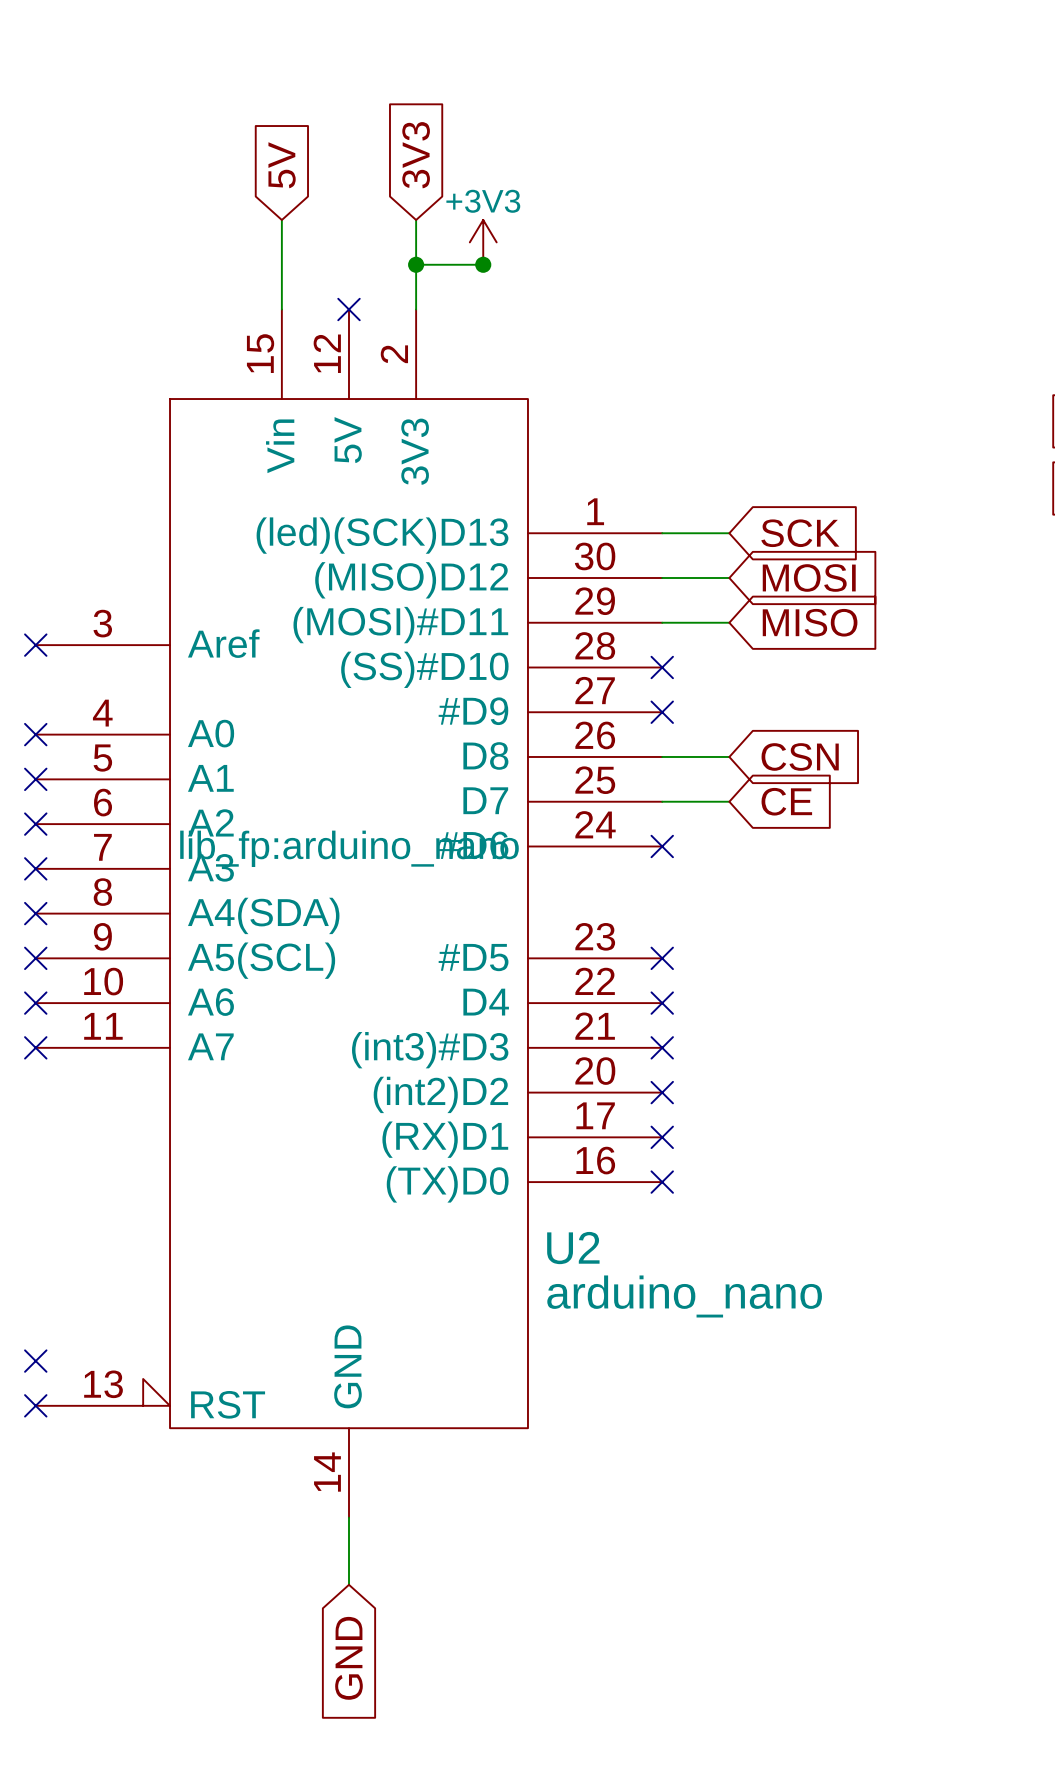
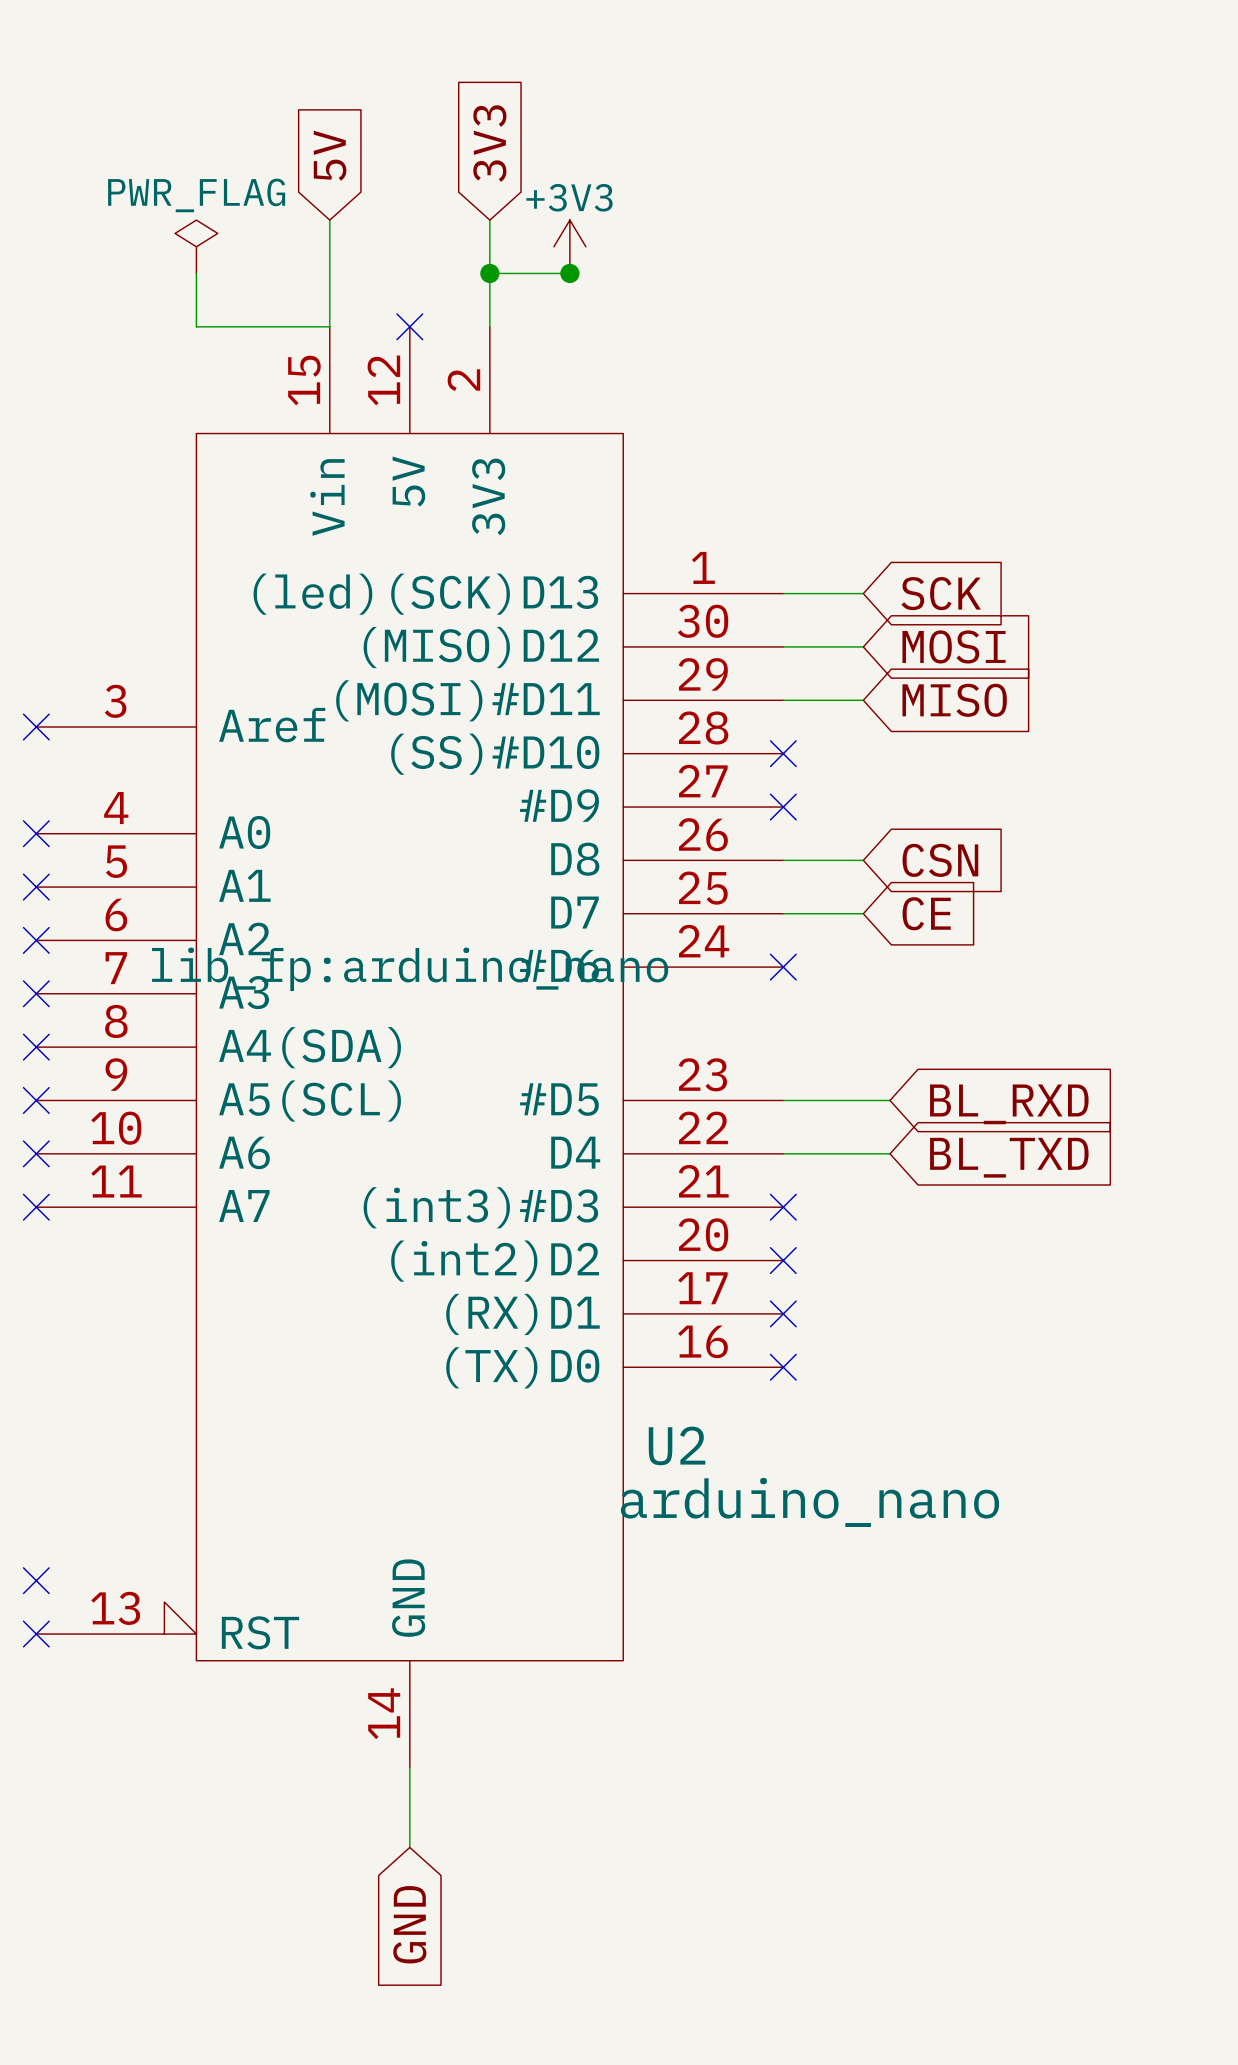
power symbol: none -> PWR_FLAG (196, 246)
wire: none -> (196, 273) (196, 326) (329, 326)
wire: none -> (783, 1100) (890, 1100)
no-connect mark: (662, 958) -> none
global label: none -> BL_RXD (1009, 1104)
wire: none -> (783, 1153) (890, 1153)
no-connect mark: (662, 1003) -> none
global label: none -> BL_TXD (1009, 1157)

